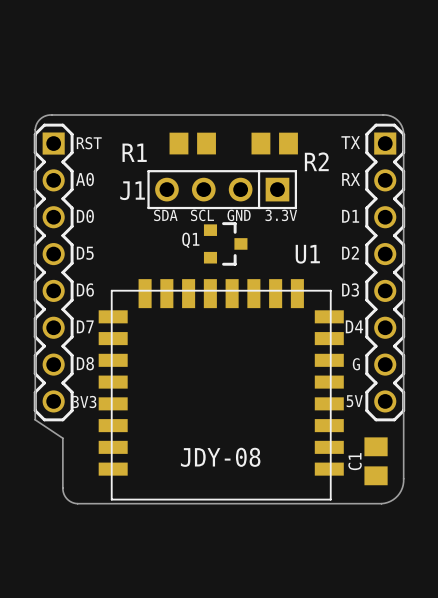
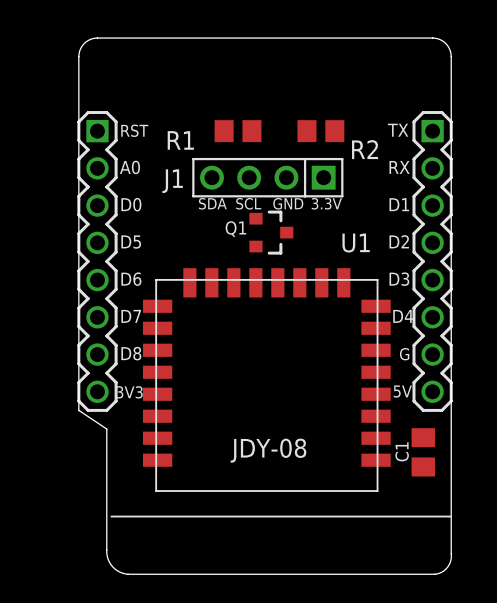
board edge: (35, 129) (39, 120) (49, 115) (383, 114) (397, 120) (403, 133) -> (78, 117) (79, 54) (82, 45) (92, 38) (432, 38) (443, 41) (450, 51) (451, 120)
board edge: (403, 478) (402, 487) (397, 495) (390, 501) (381, 503) (77, 503) (67, 498) (62, 488) -> (451, 470) (451, 558) (445, 569) (435, 574) (122, 573) (112, 566) (107, 556) (106, 479)
line: none -> (111, 516) (450, 516)

